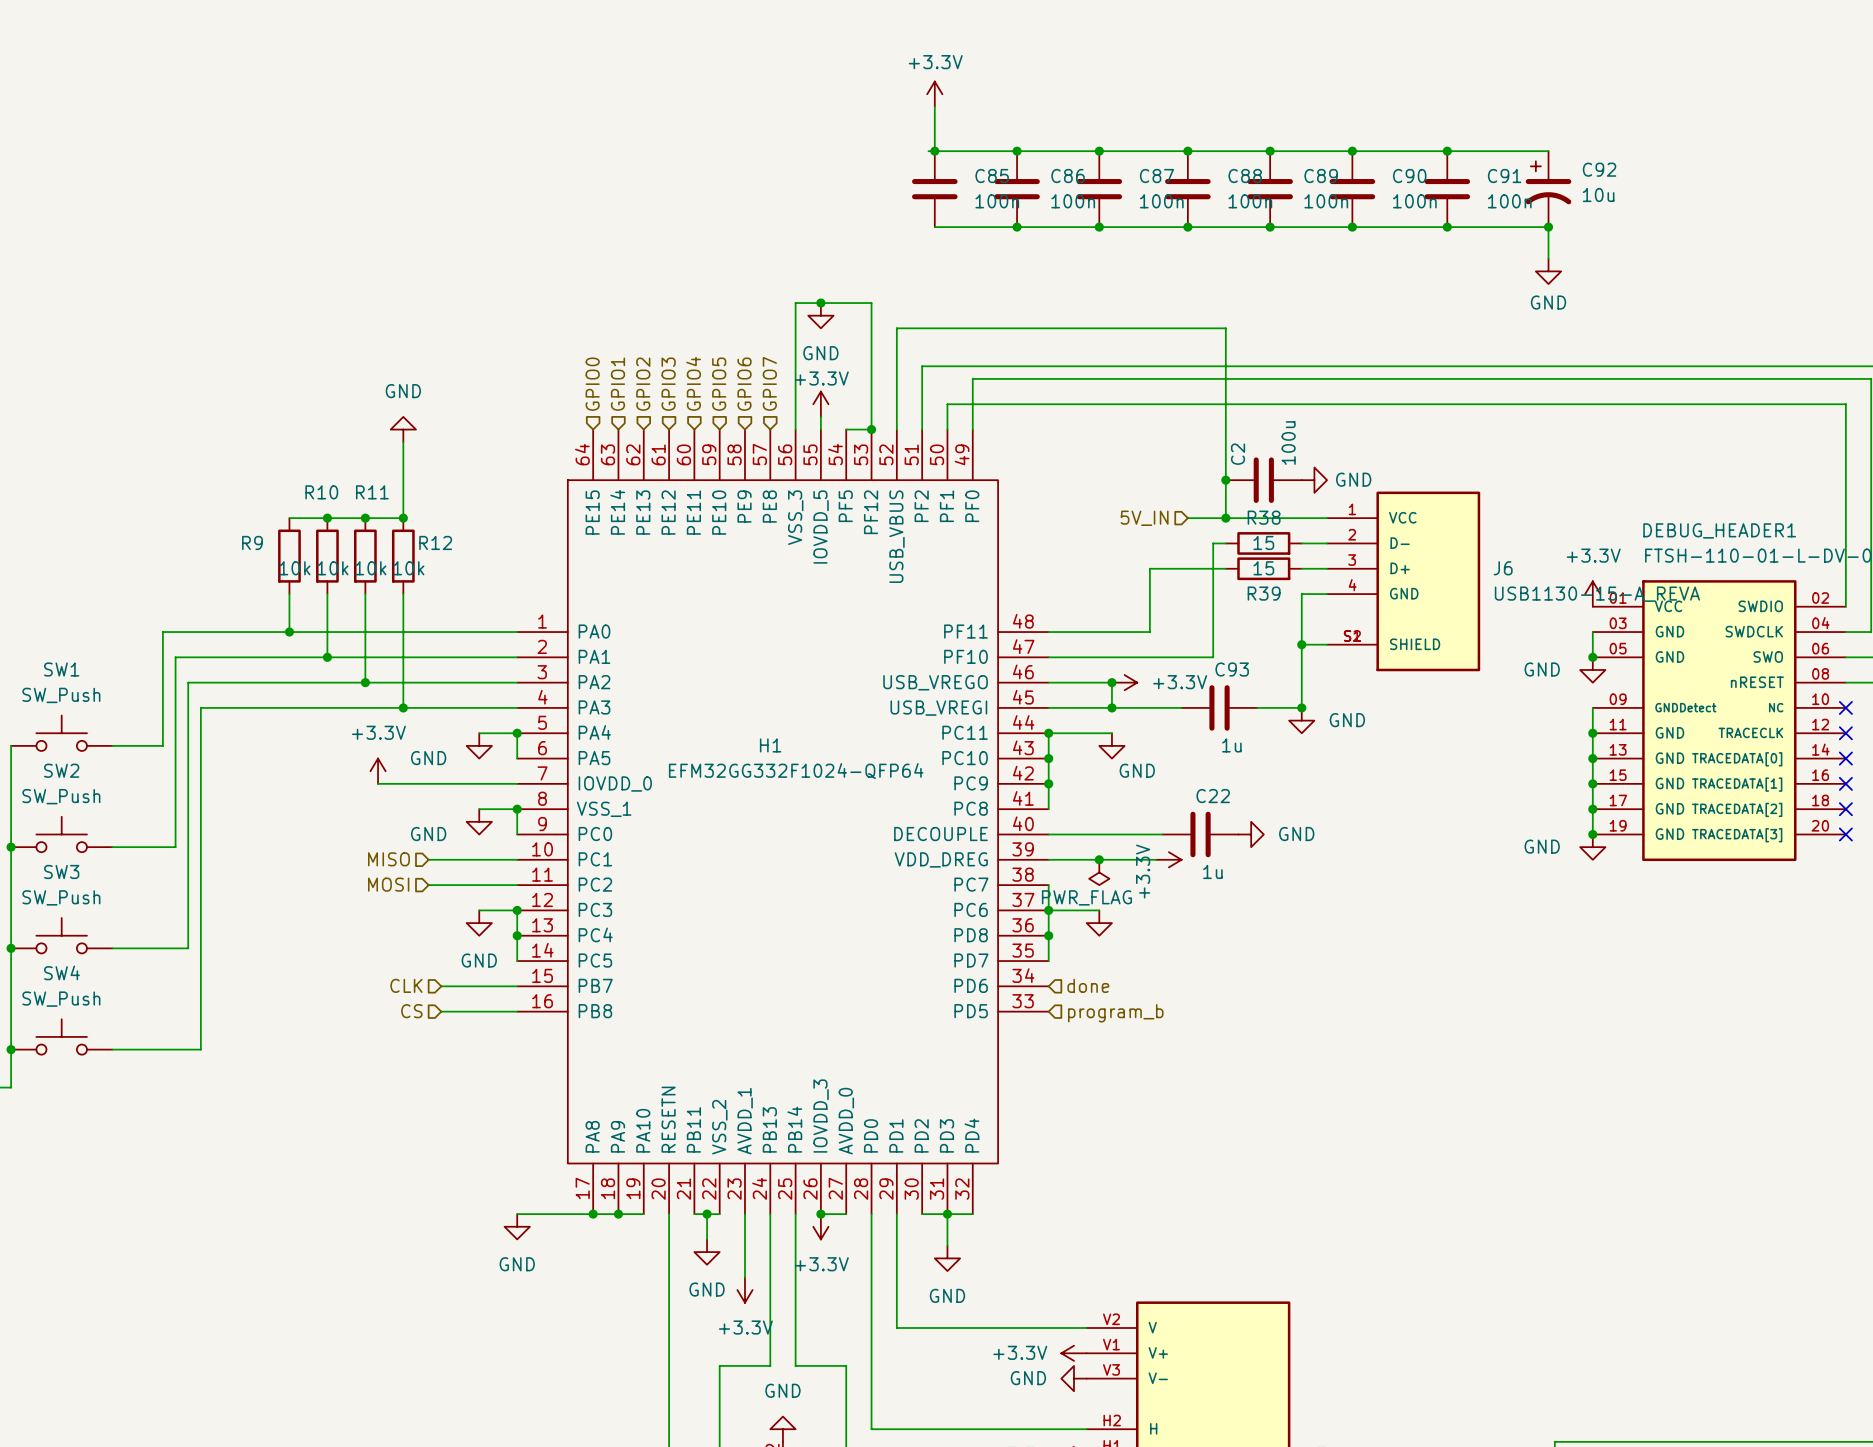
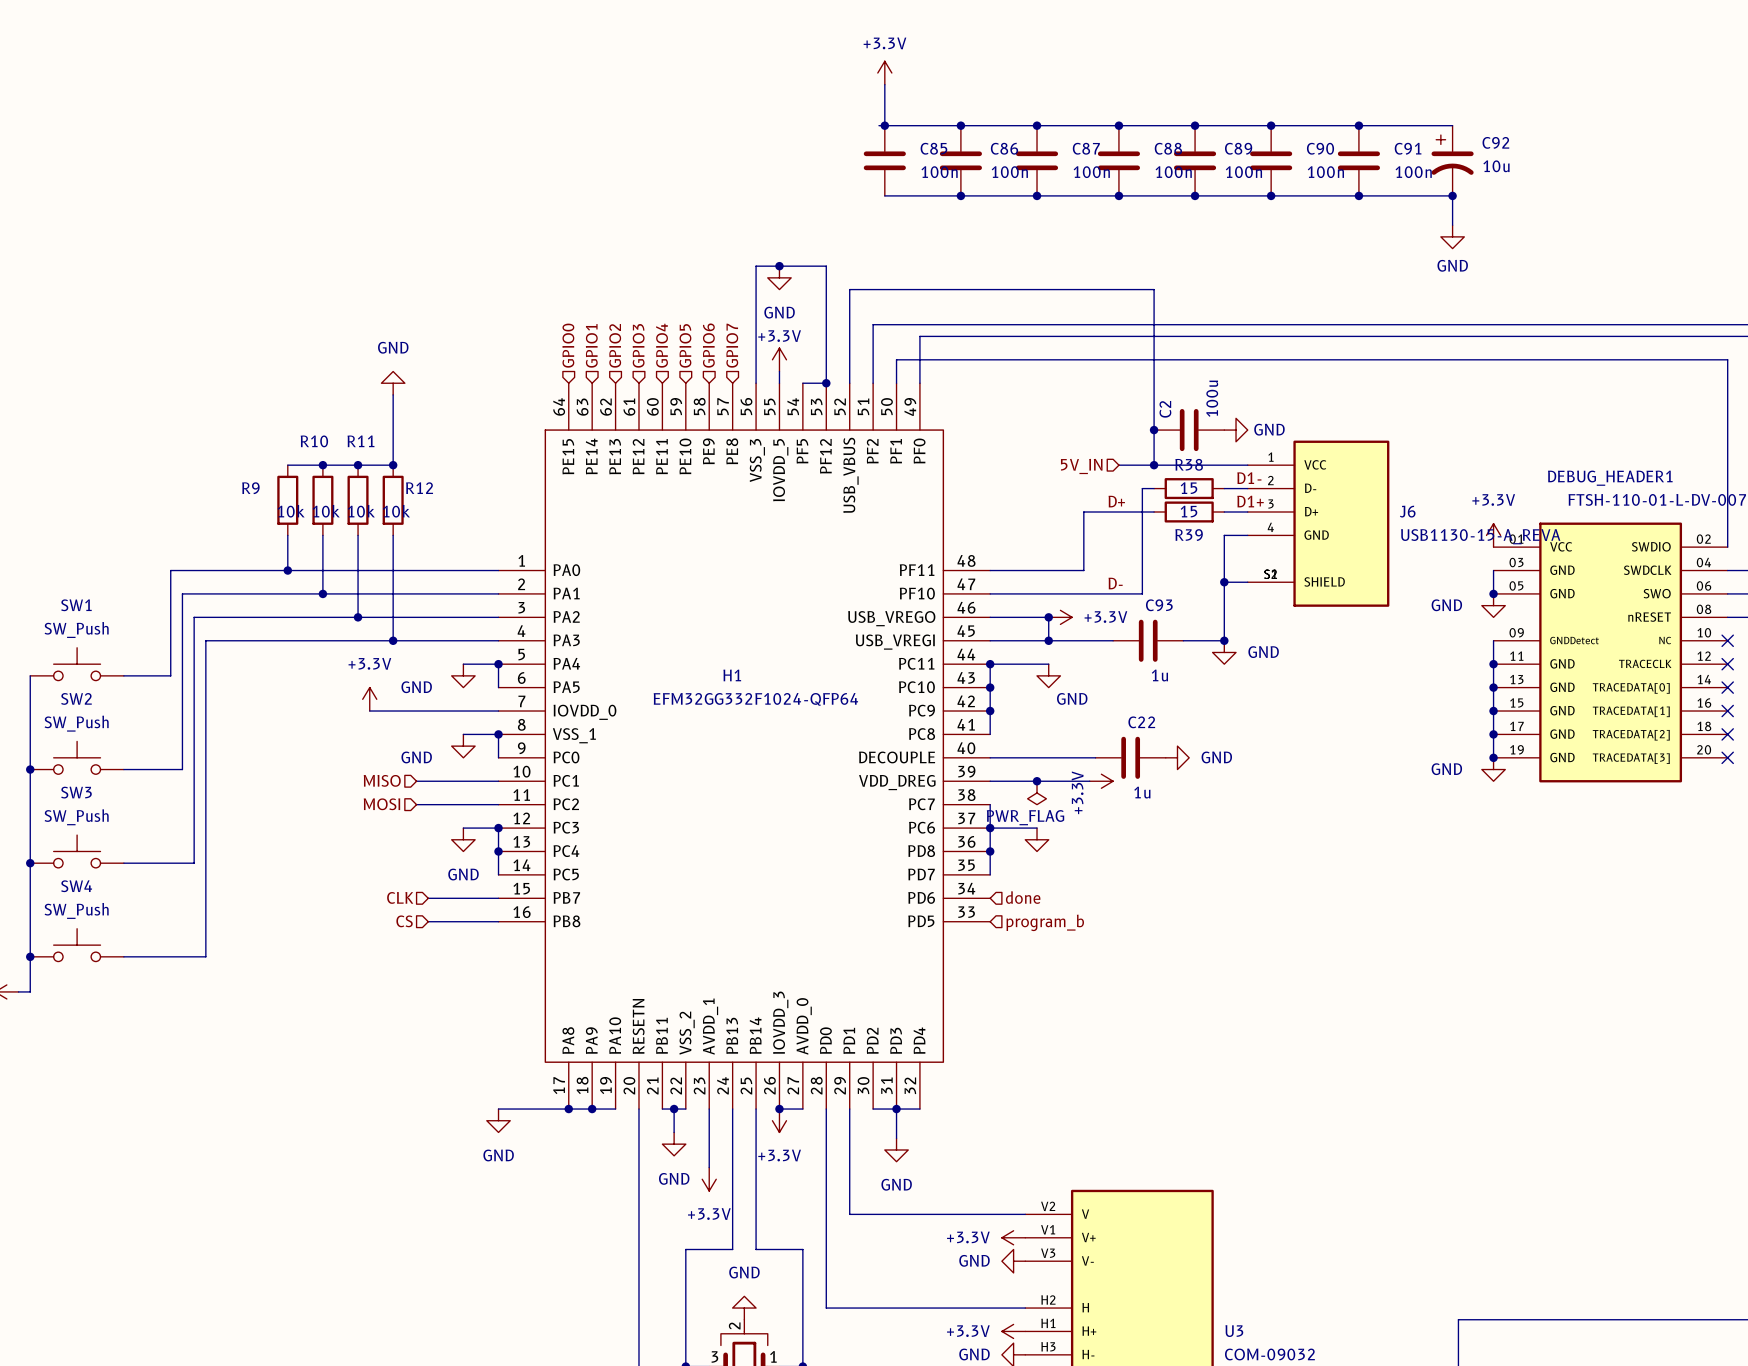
label: none -> D1- (1249, 478)
label: none -> D+ (1116, 501)
label: none -> D1+ (1250, 501)
label: none -> D- (1115, 583)

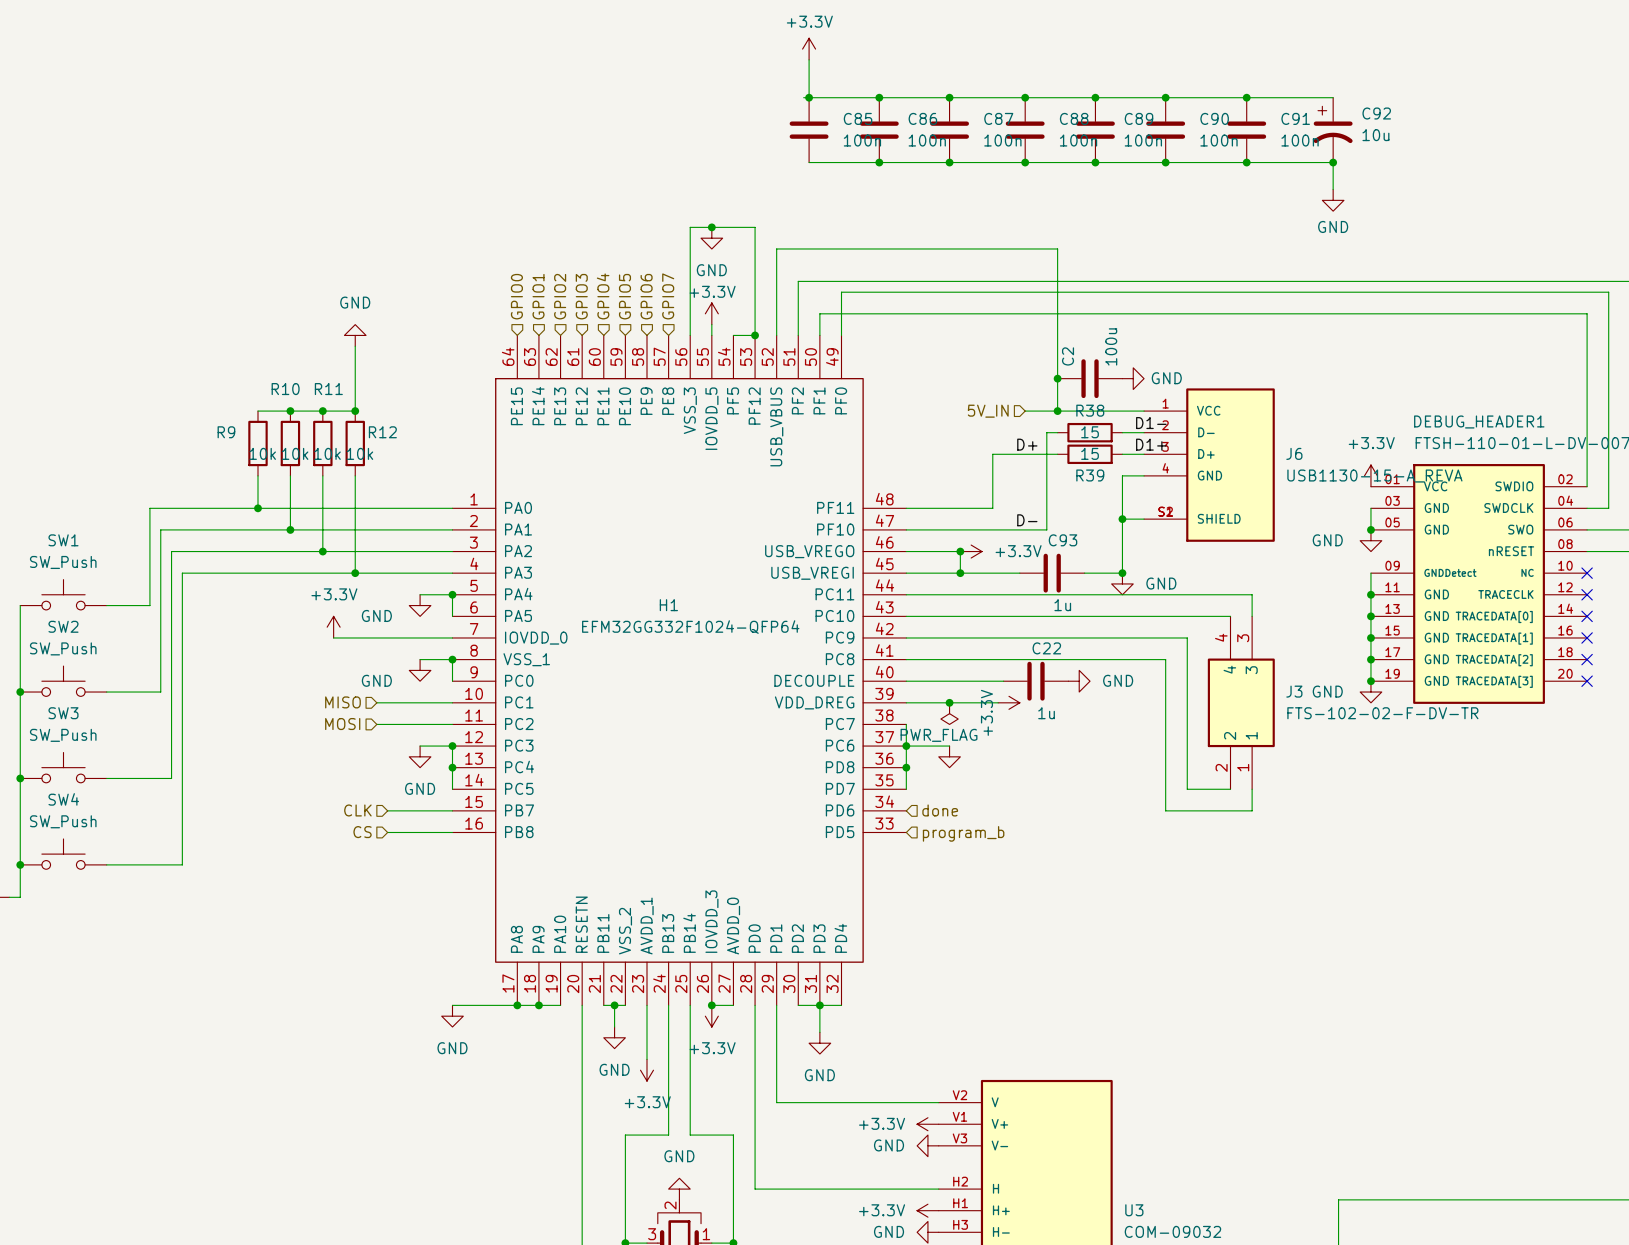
wire: (990, 664) (990, 734) -> (1252, 789) (1252, 810) (1165, 810) (1165, 659) (906, 659)
junction: (990, 664) -> none
wire: none -> (960, 594) (1252, 594) (1252, 616)
power symbol: GND (1048, 675) -> none
wire: none -> (906, 616) (1230, 616)
junction: (990, 687) -> none
wire: none -> (906, 637) (1187, 637) (1187, 789) (1230, 789)
junction: (990, 711) -> none
J3: none -> FTS-102-02-F-DV-TR (1241, 702)

